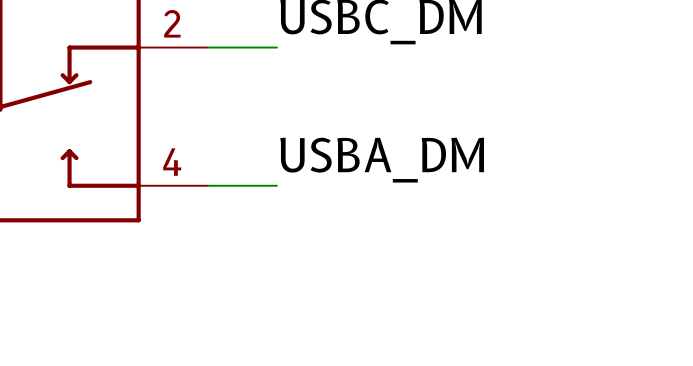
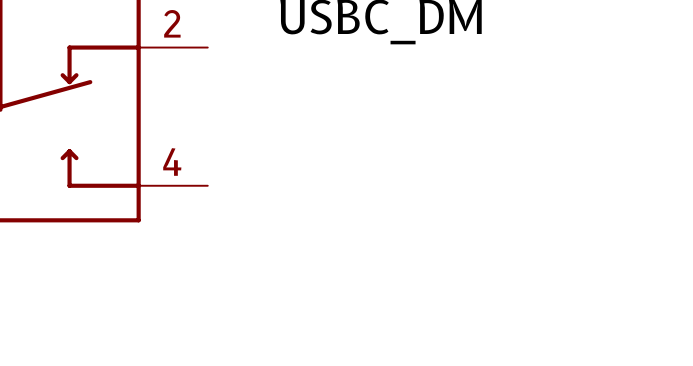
wire: (207, 47) (276, 47) -> none
label: USBA_DM (382, 160) -> none
wire: (207, 185) (276, 185) -> none

